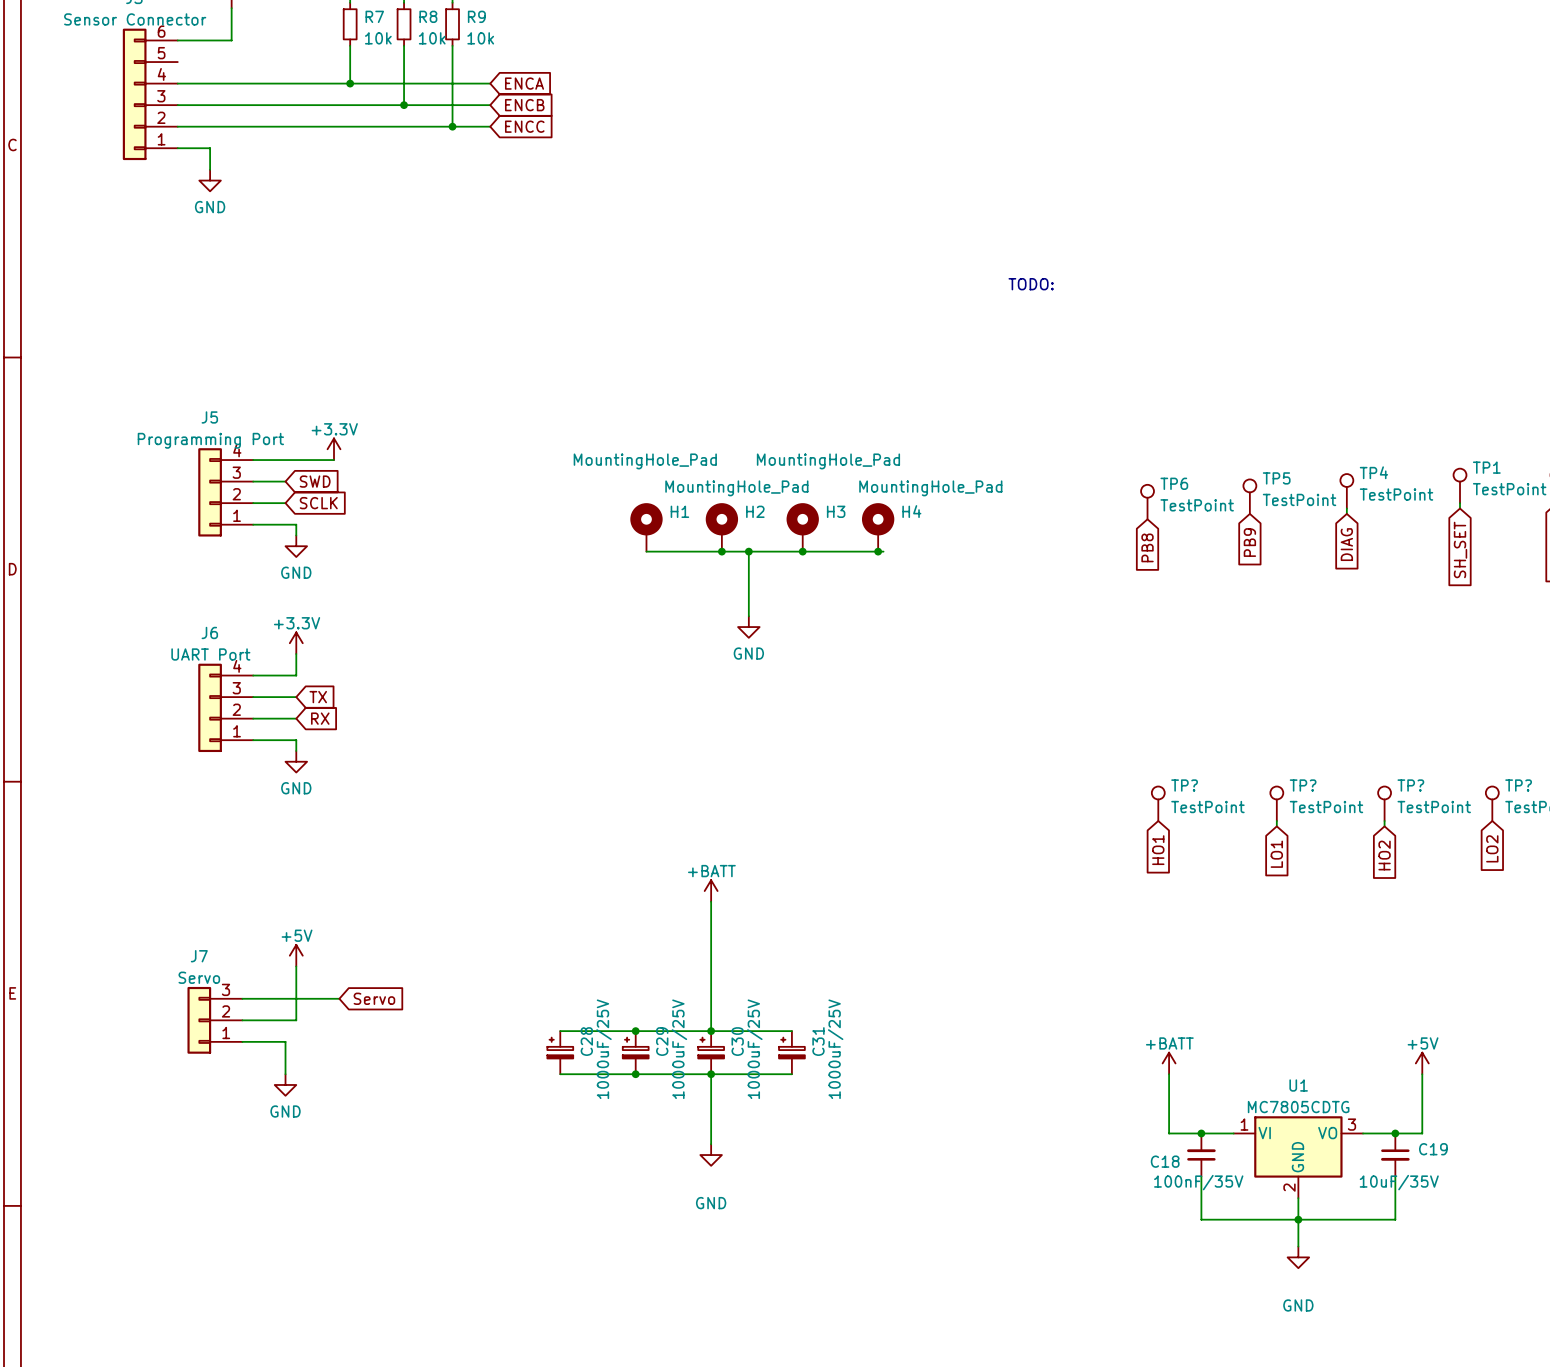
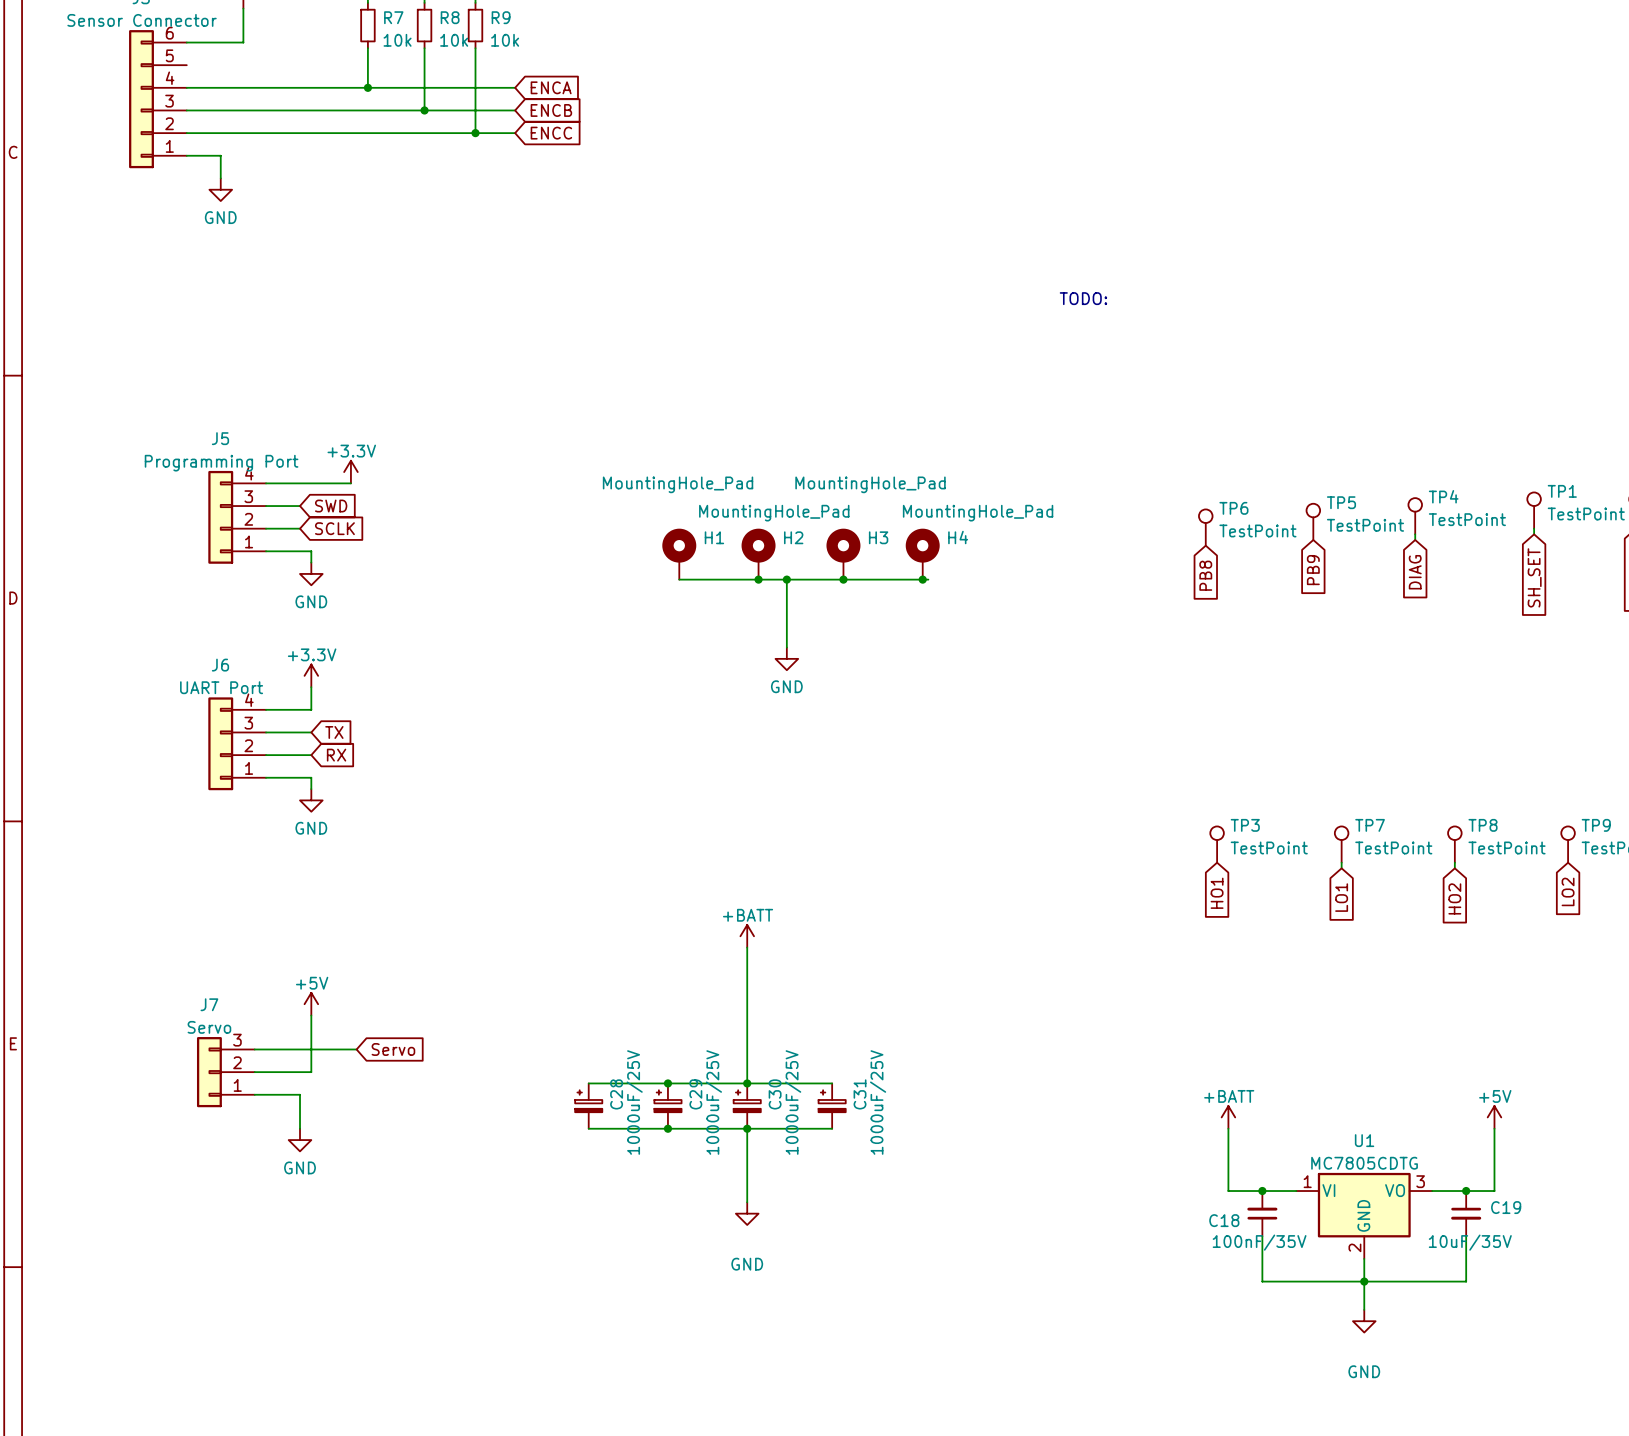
TP? name: TP? (1184, 785) -> TP3 (1245, 825)
TP? name: TP? (1303, 785) -> TP7 (1370, 825)
TP? name: TP? (1410, 785) -> TP8 (1483, 825)
TP? name: TP? (1518, 785) -> TP9 (1596, 825)

